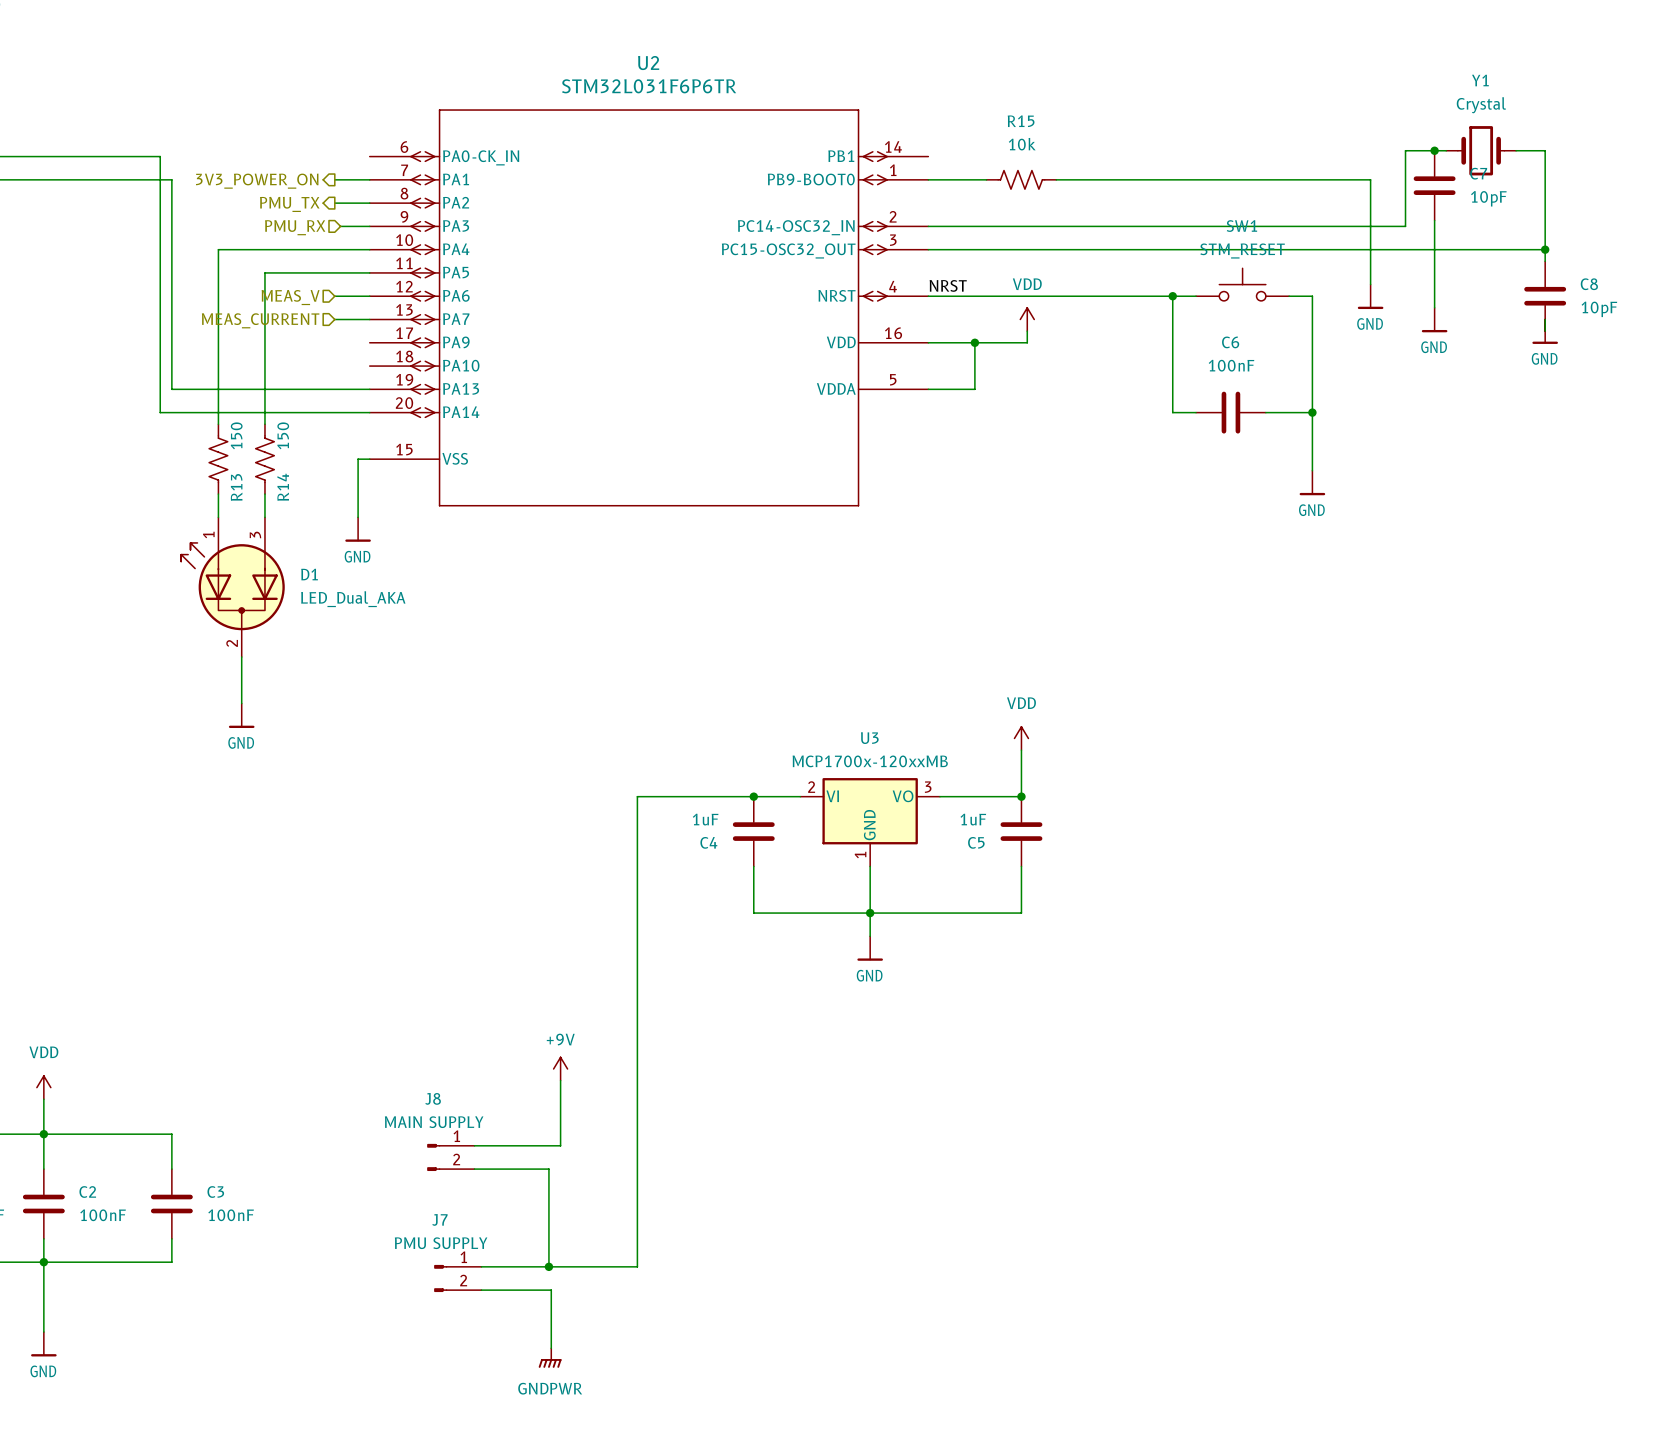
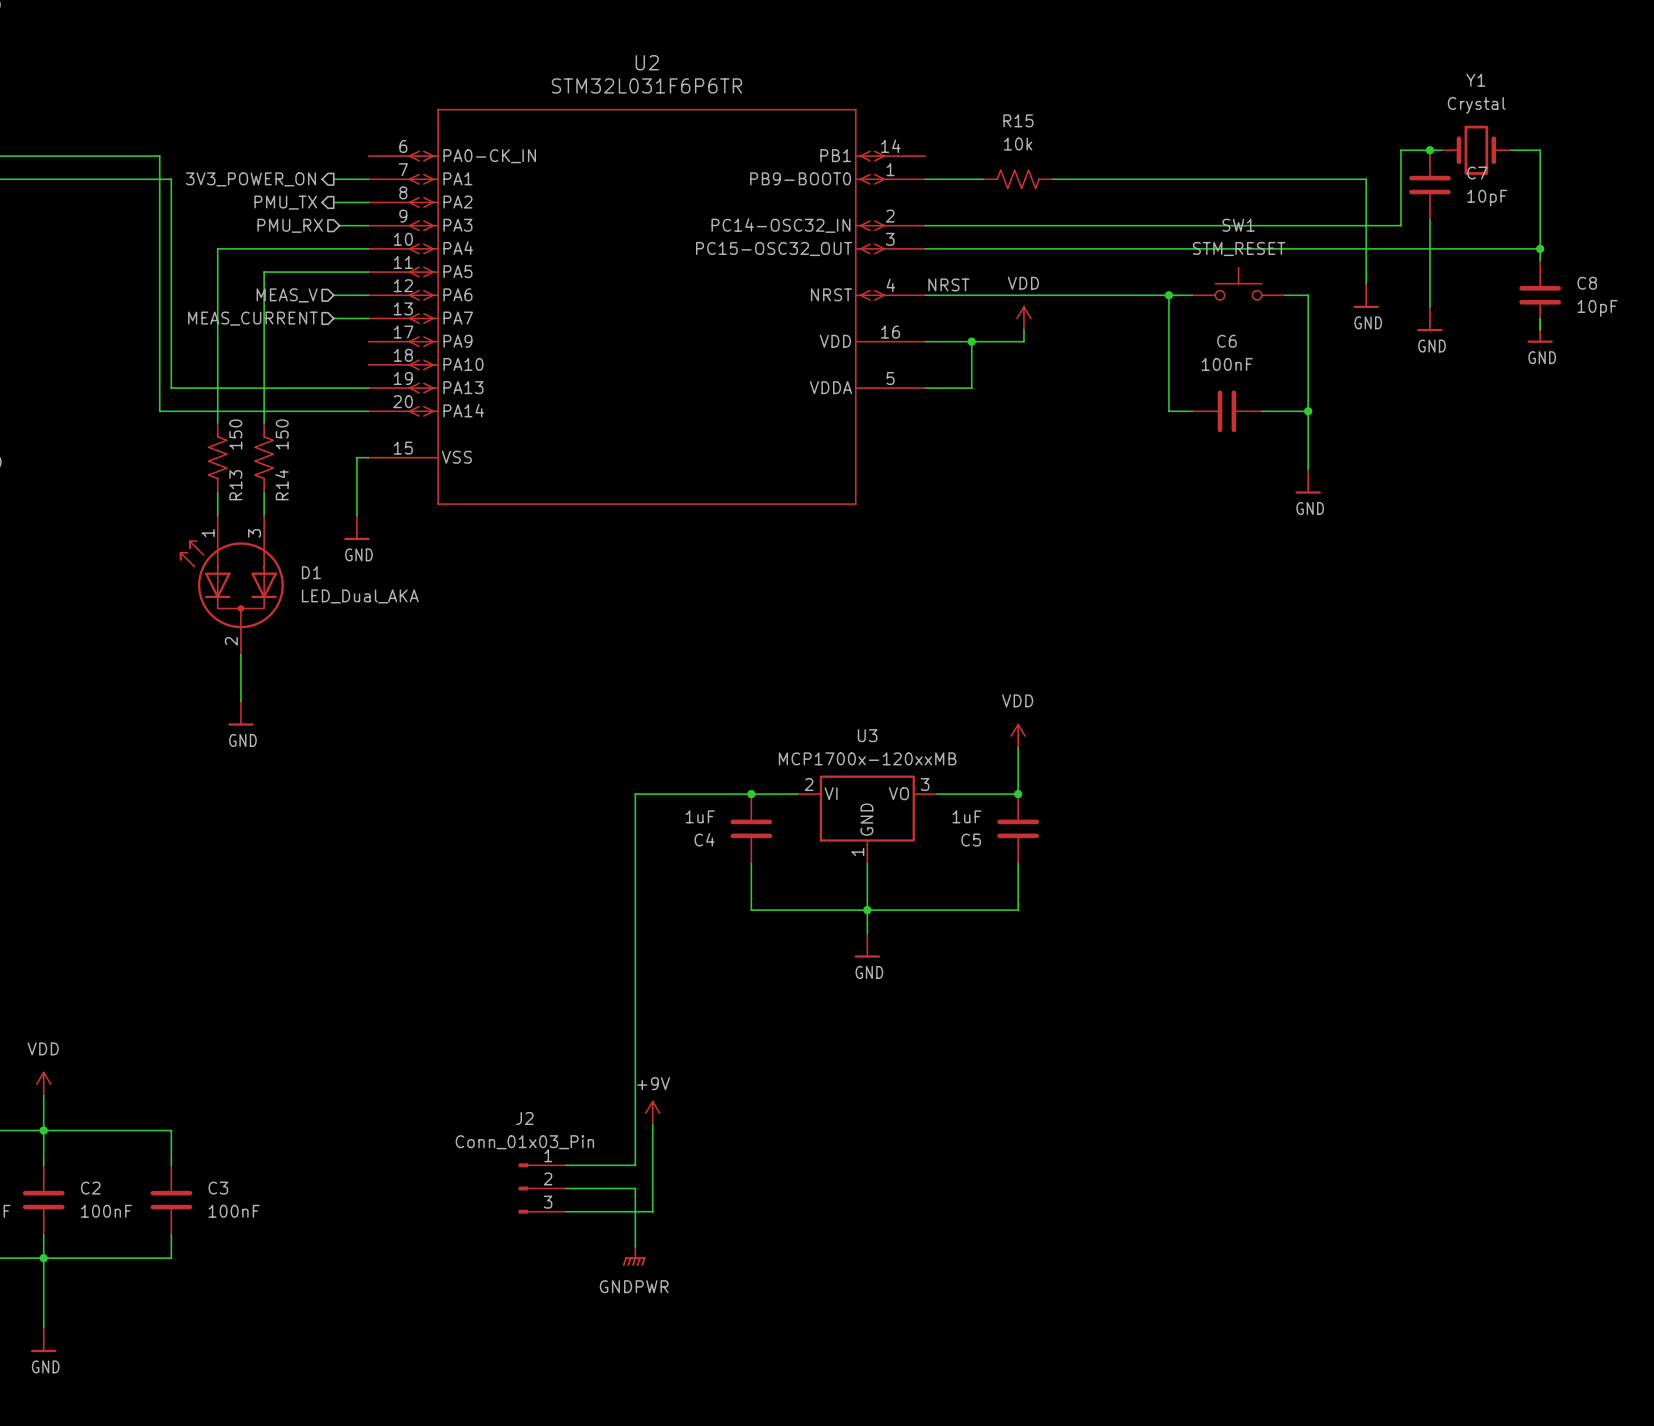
power symbol position: +9V (560, 1069) -> +9V (652, 1113)
wire: (560, 1080) (560, 1145) (474, 1145) -> none
wire: none -> (652, 1124) (652, 1211) (565, 1211)
J8: MAIN SUPPLY (450, 1157) -> none
wire: (474, 1169) (548, 1169) (548, 1266) -> none
wire: (637, 1169) (637, 1192) -> (635, 1165) (565, 1165)
J2: none -> Conn_01x03_Pin (542, 1188)
wire: none -> (565, 1188) (635, 1188)
wire: (637, 1250) (637, 1266) (481, 1266) -> none
junction: (548, 1266) -> none
J7: PMU SUPPLY (457, 1278) -> none
wire: (481, 1290) (551, 1290) (551, 1348) -> none
power symbol position: GNDPWR (550, 1358) -> GNDPWR (634, 1256)

